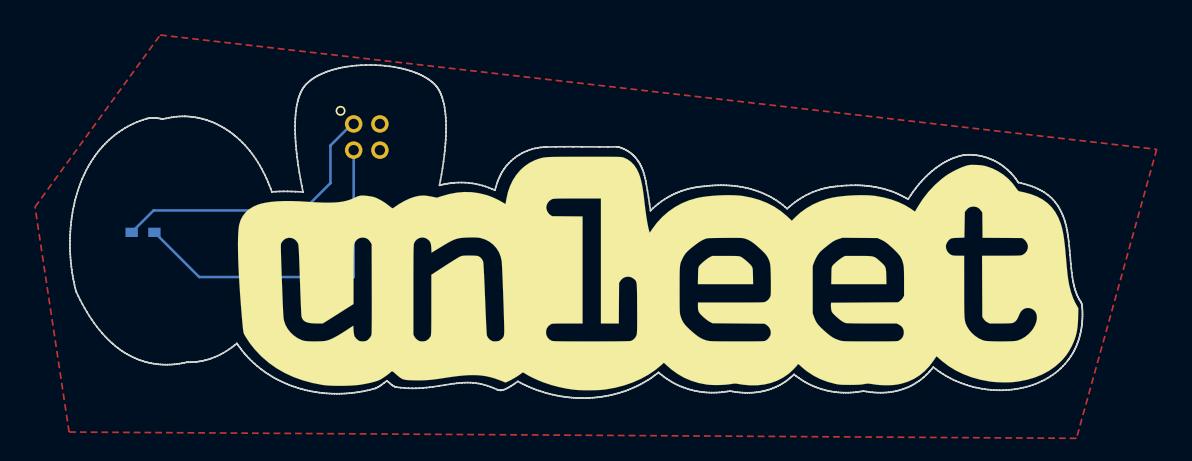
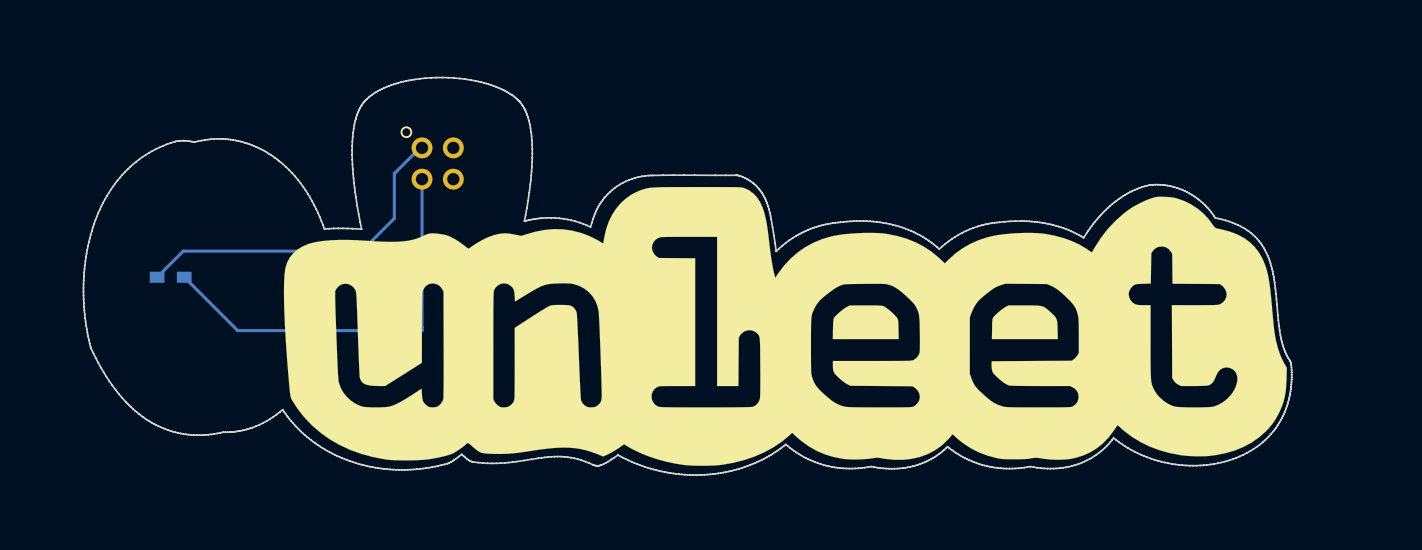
top zone outline: (160, 35) (35, 206) (69, 432) (1076, 438) (1156, 149) (160, 35) -> none

